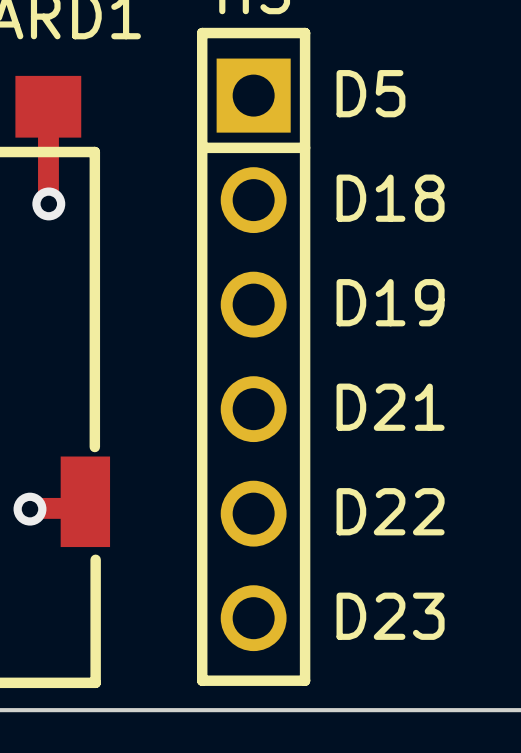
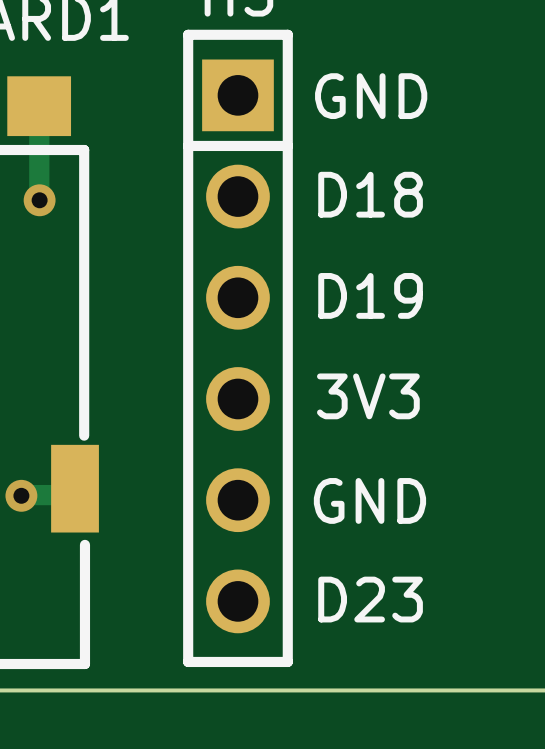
text: D5 (370, 93) -> GND (371, 96)
text: D21 (390, 407) -> 3V3 (368, 396)
text: D22 (390, 511) -> GND (369, 500)

